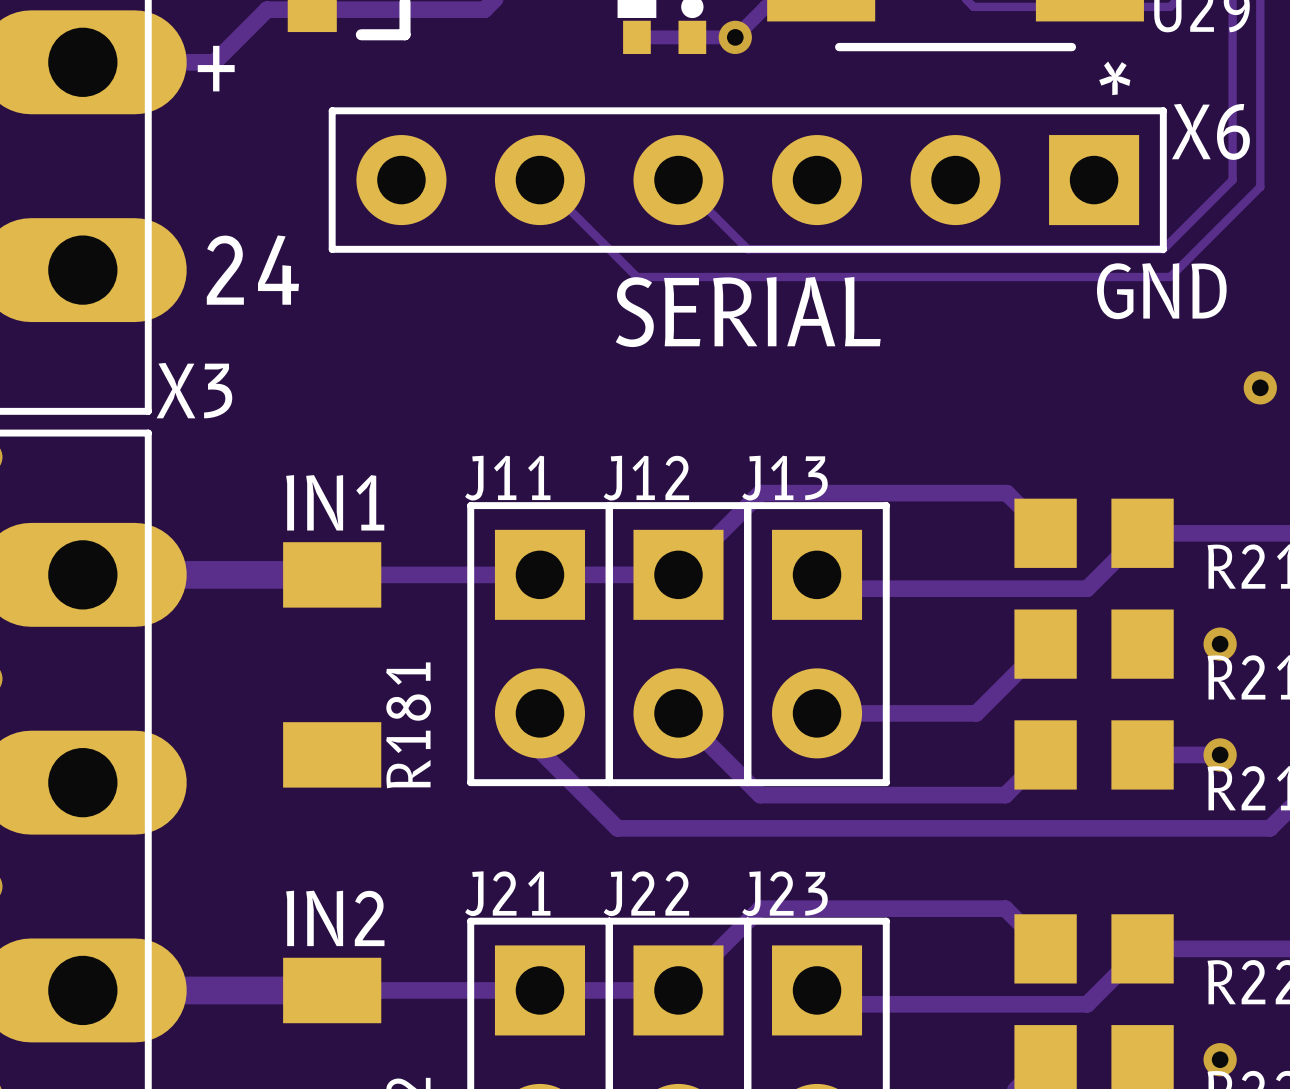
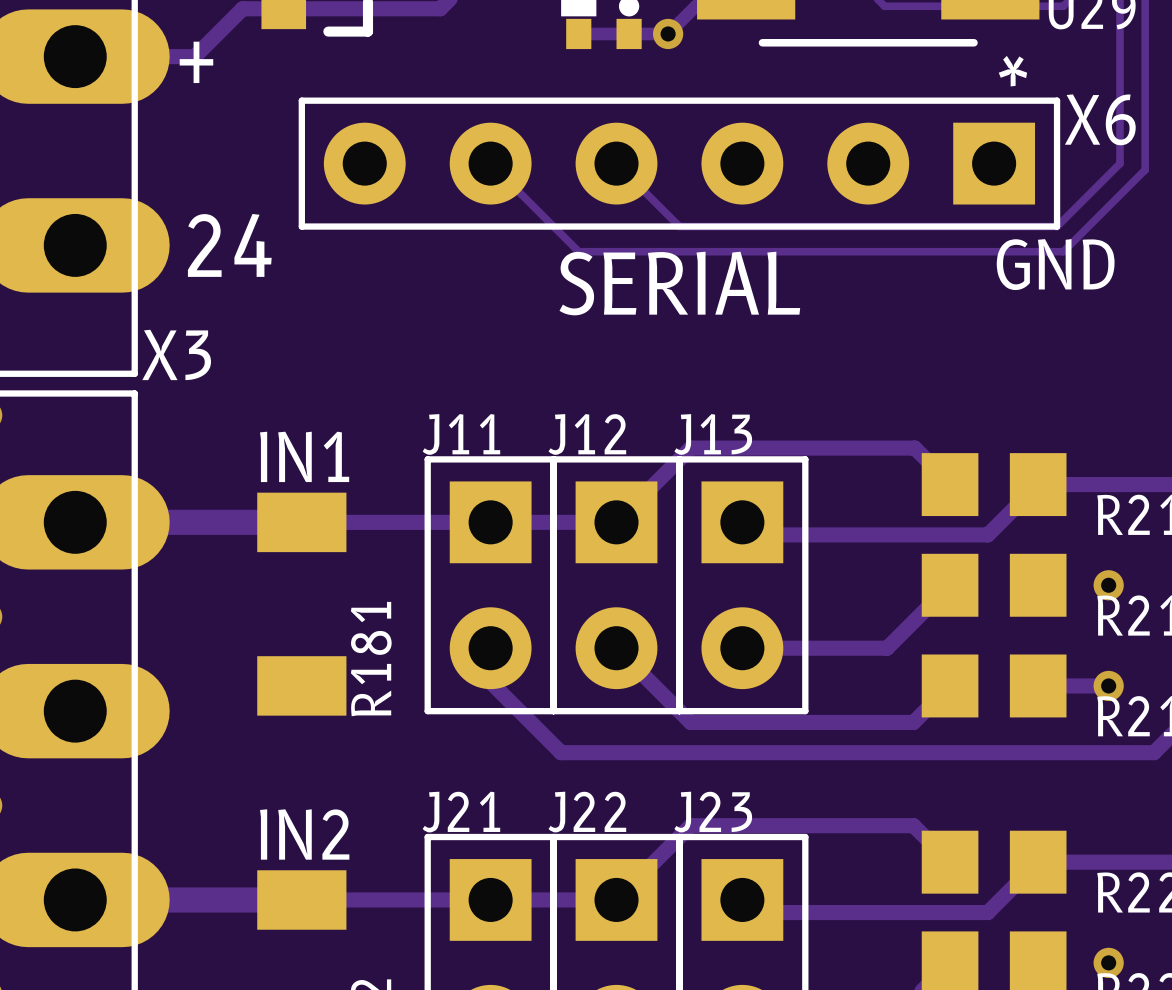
via: (1260, 387) -> none

